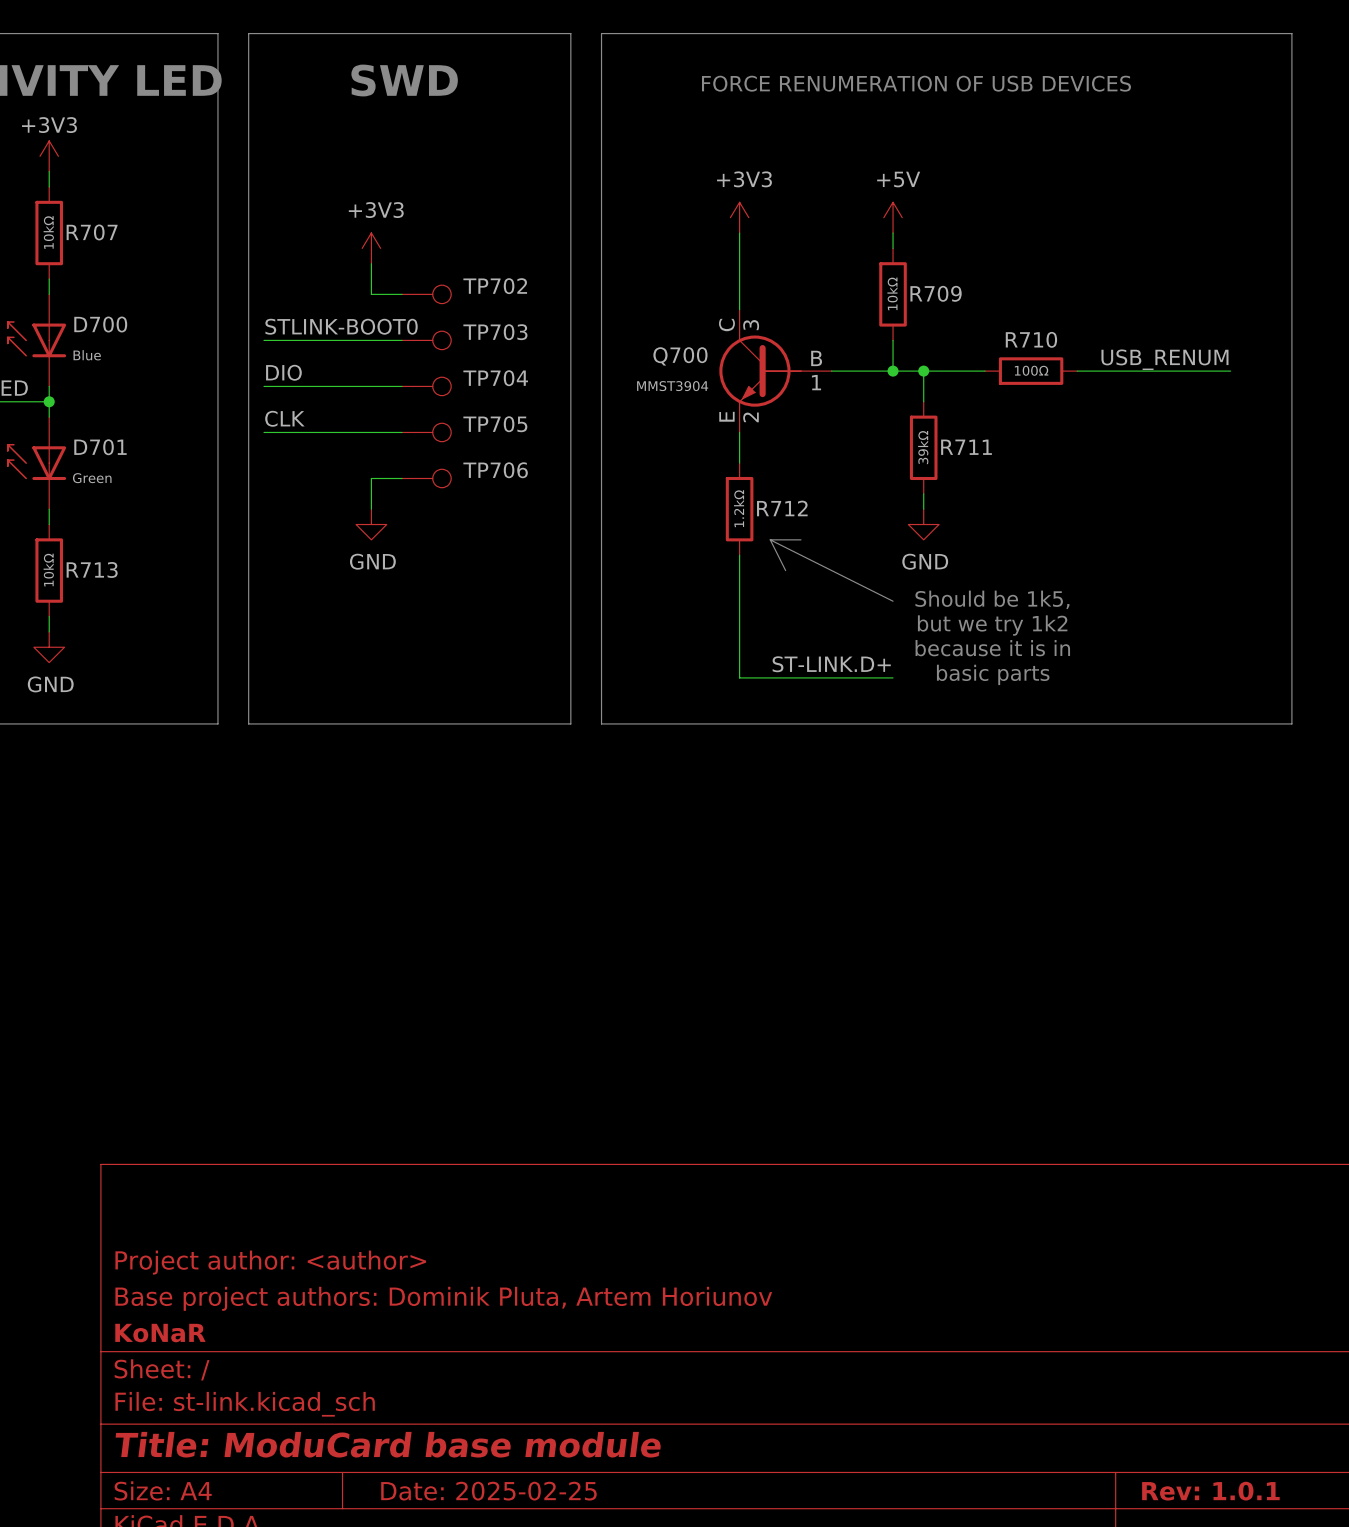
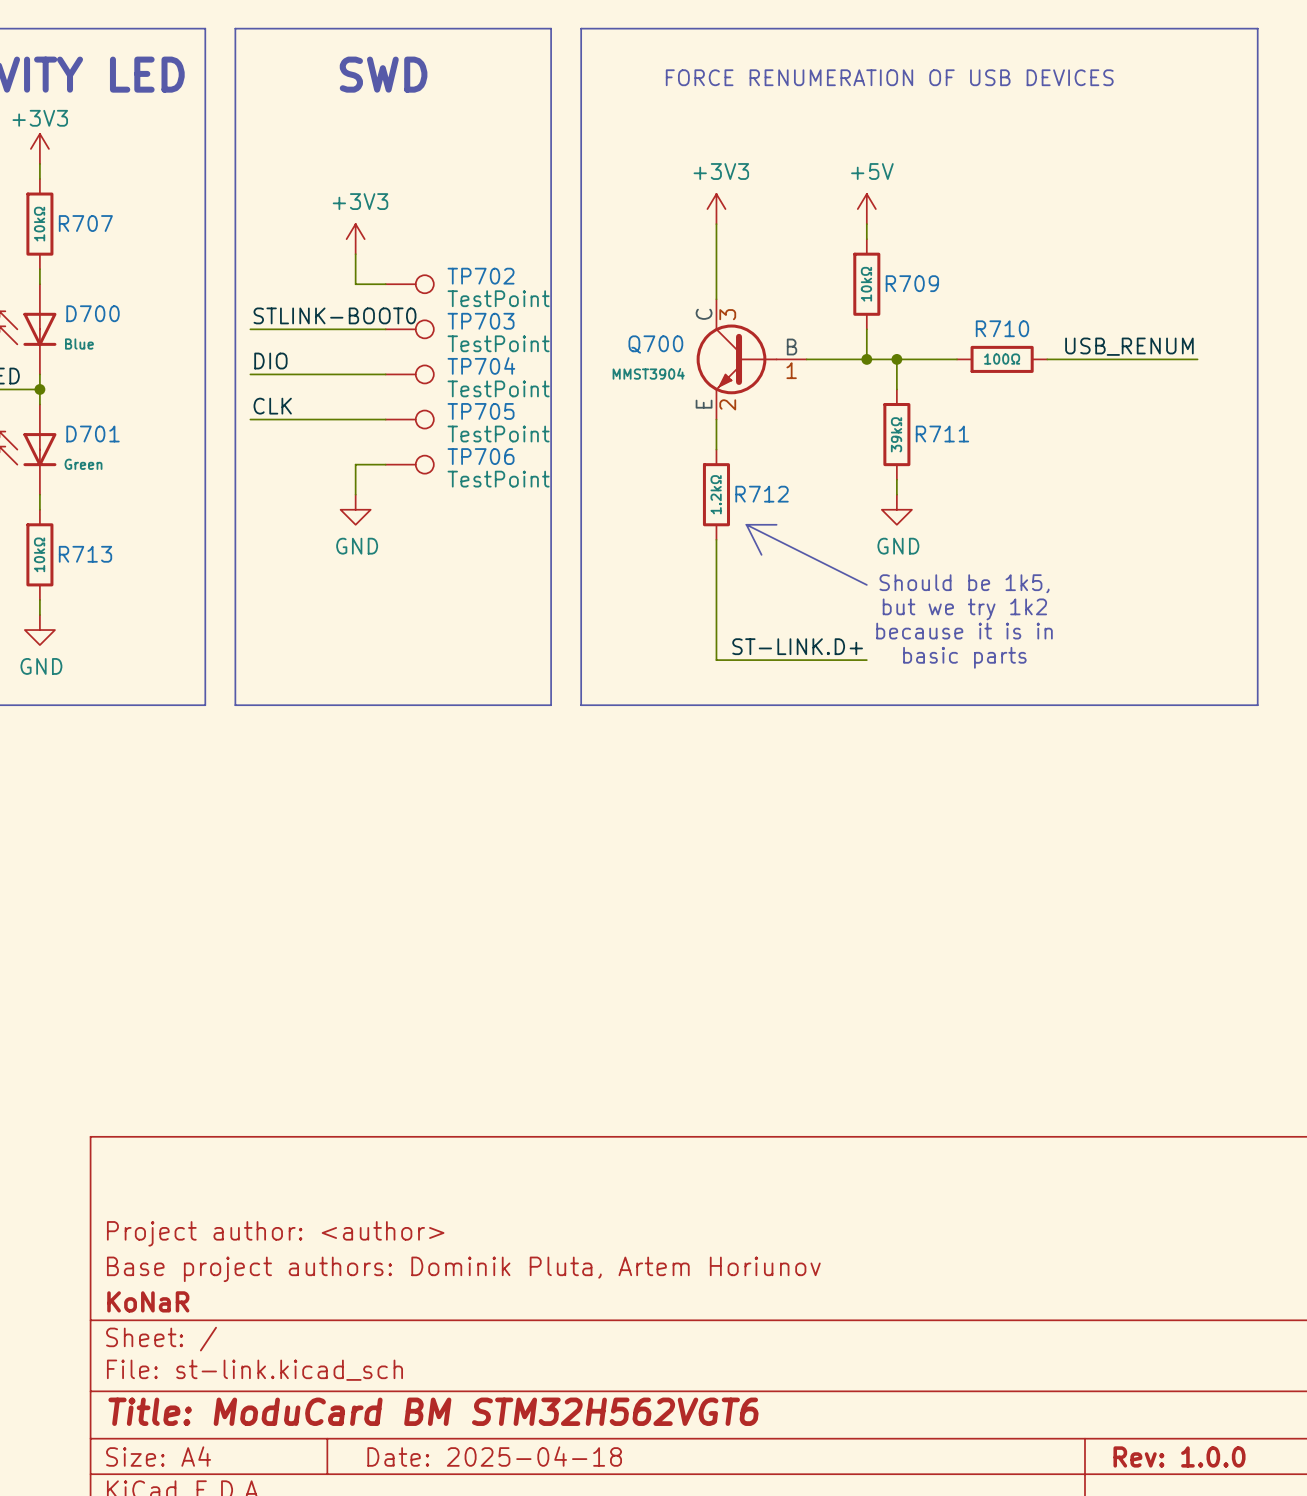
TP702 value: none -> TestPoint (498, 298)
TP703 value: none -> TestPoint (498, 343)
TP704 value: none -> TestPoint (498, 388)
TP705 value: none -> TestPoint (498, 434)
TP706 value: none -> TestPoint (498, 479)
title block: Title: ModuCard base module (388, 1444) -> Title: ModuCard BM STM32H562VGT6 (433, 1411)
title block: Date: 2025-02-25 (488, 1491) -> Date: 2025-04-18 (494, 1456)
title block: Rev: 1.0.1 (1210, 1491) -> Rev: 1.0.0 (1179, 1456)

